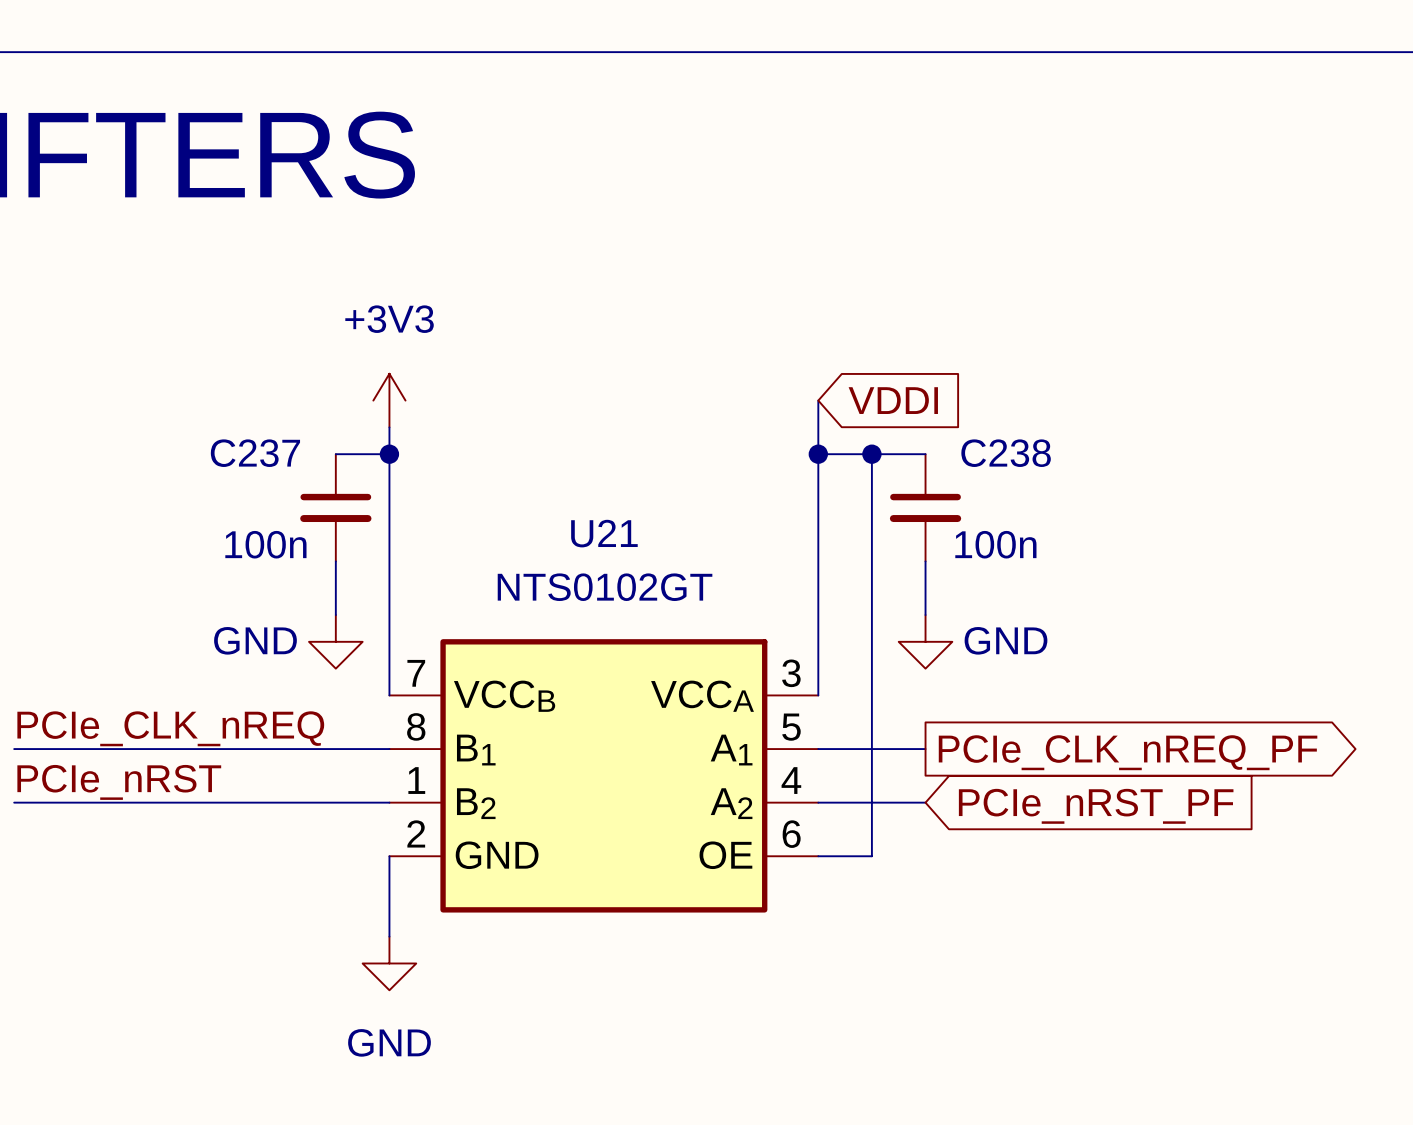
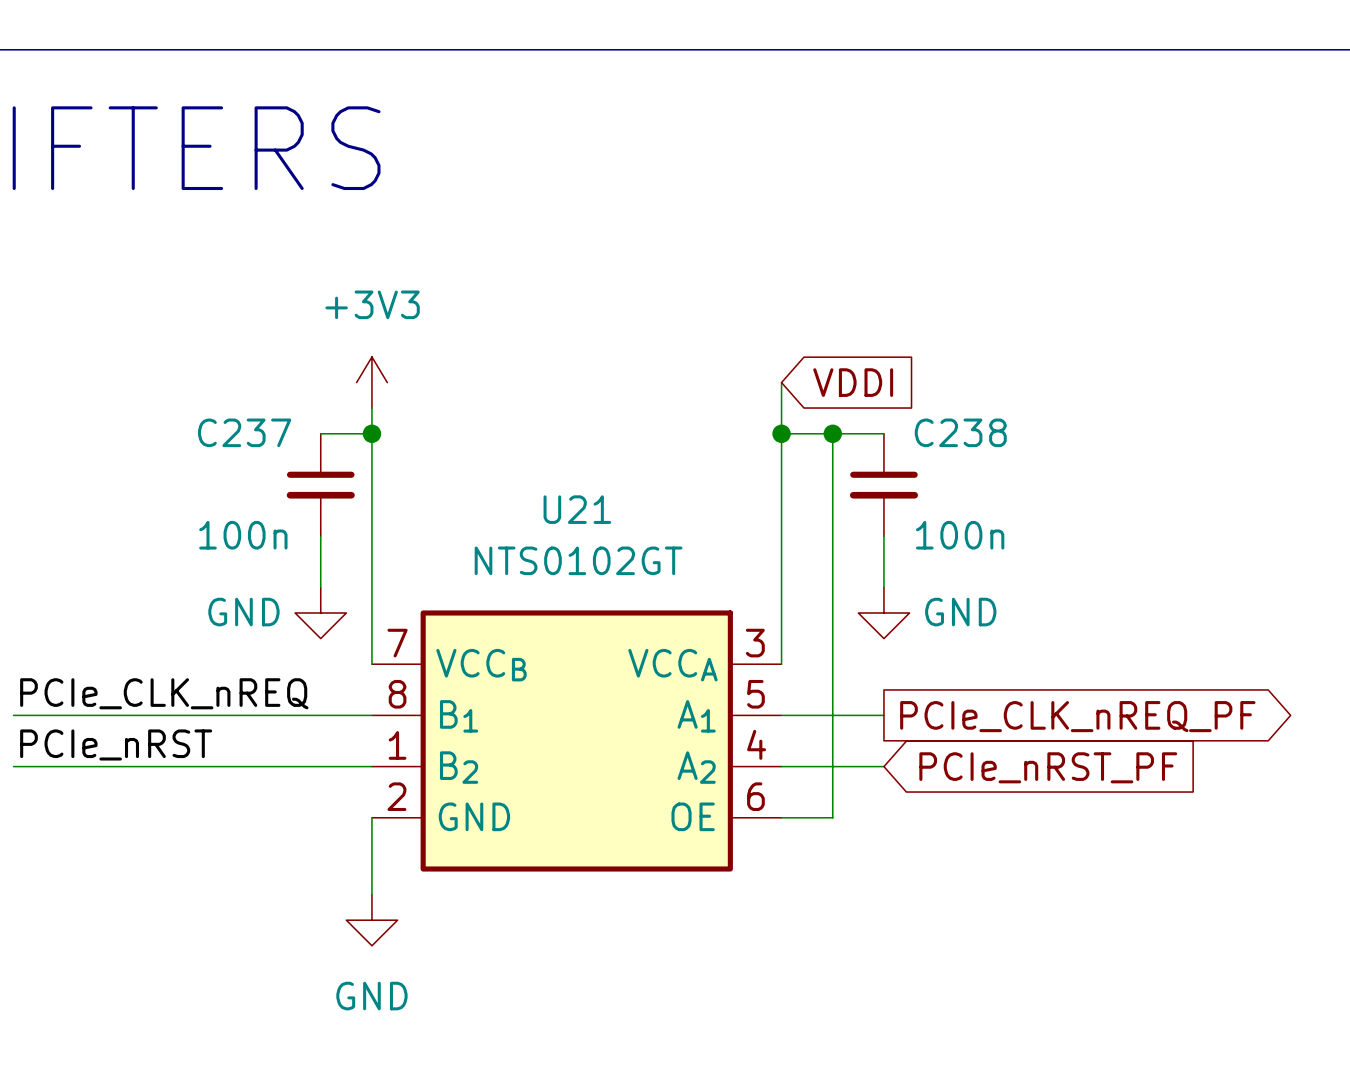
C237 text position: 100n (265, 544) -> 100n (243, 535)
C238 text position: 100n (995, 544) -> 100n (960, 535)

